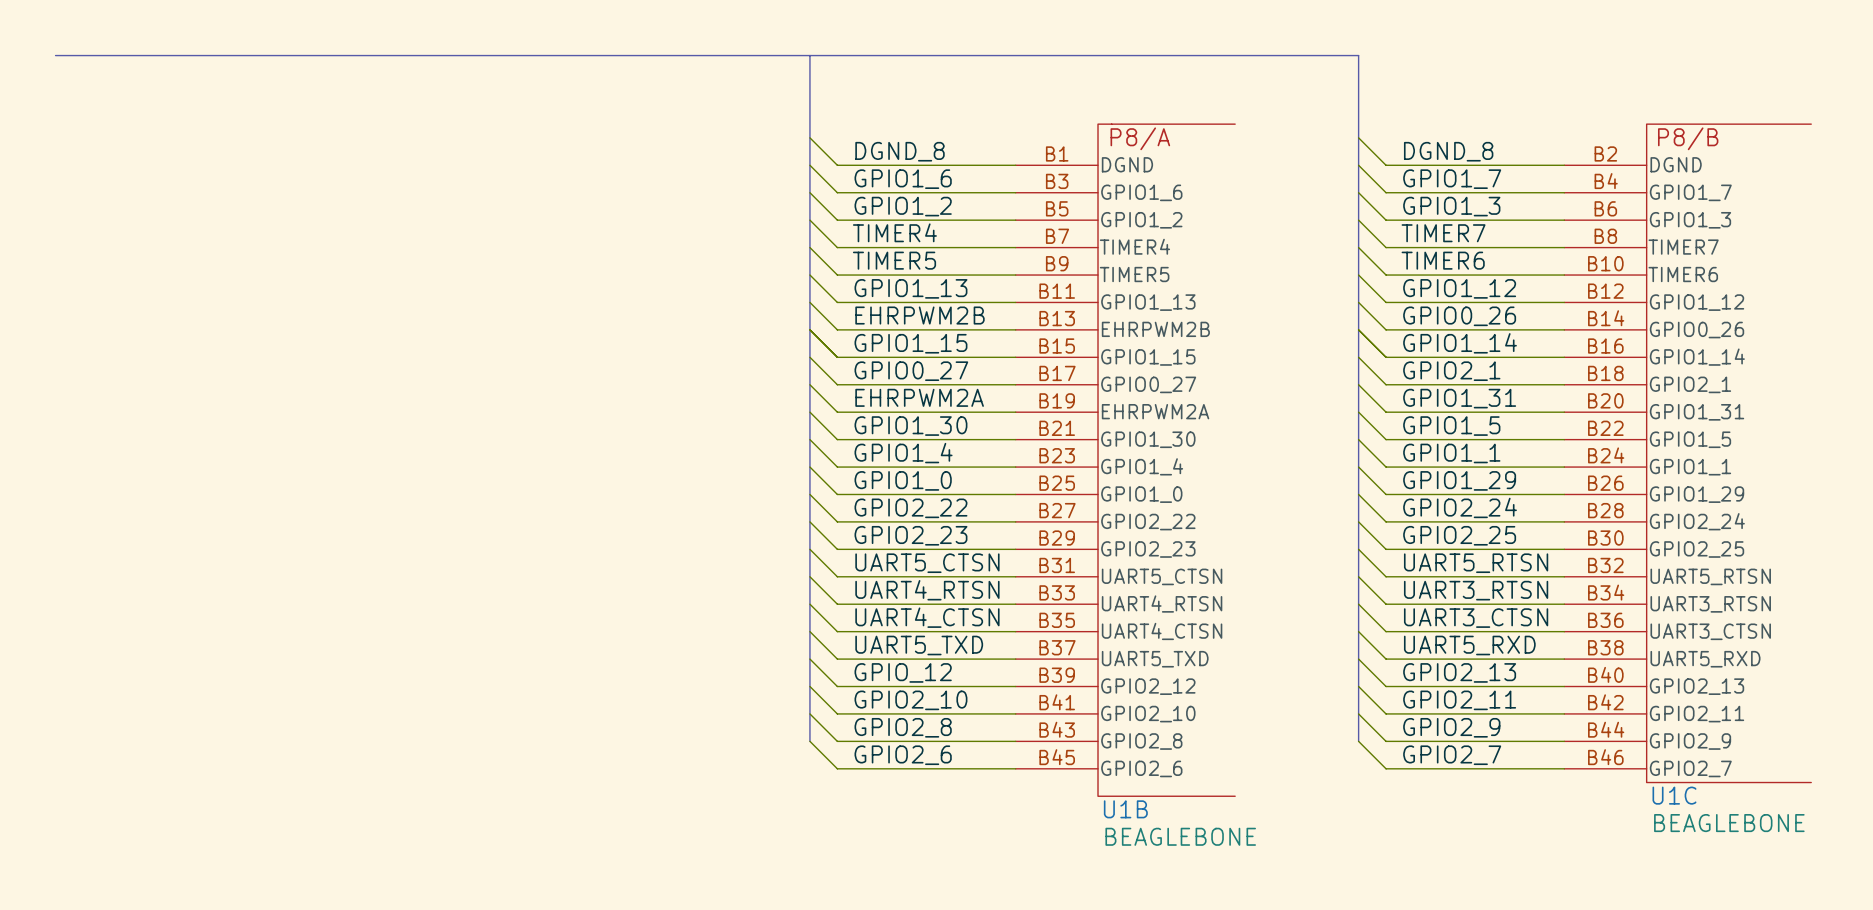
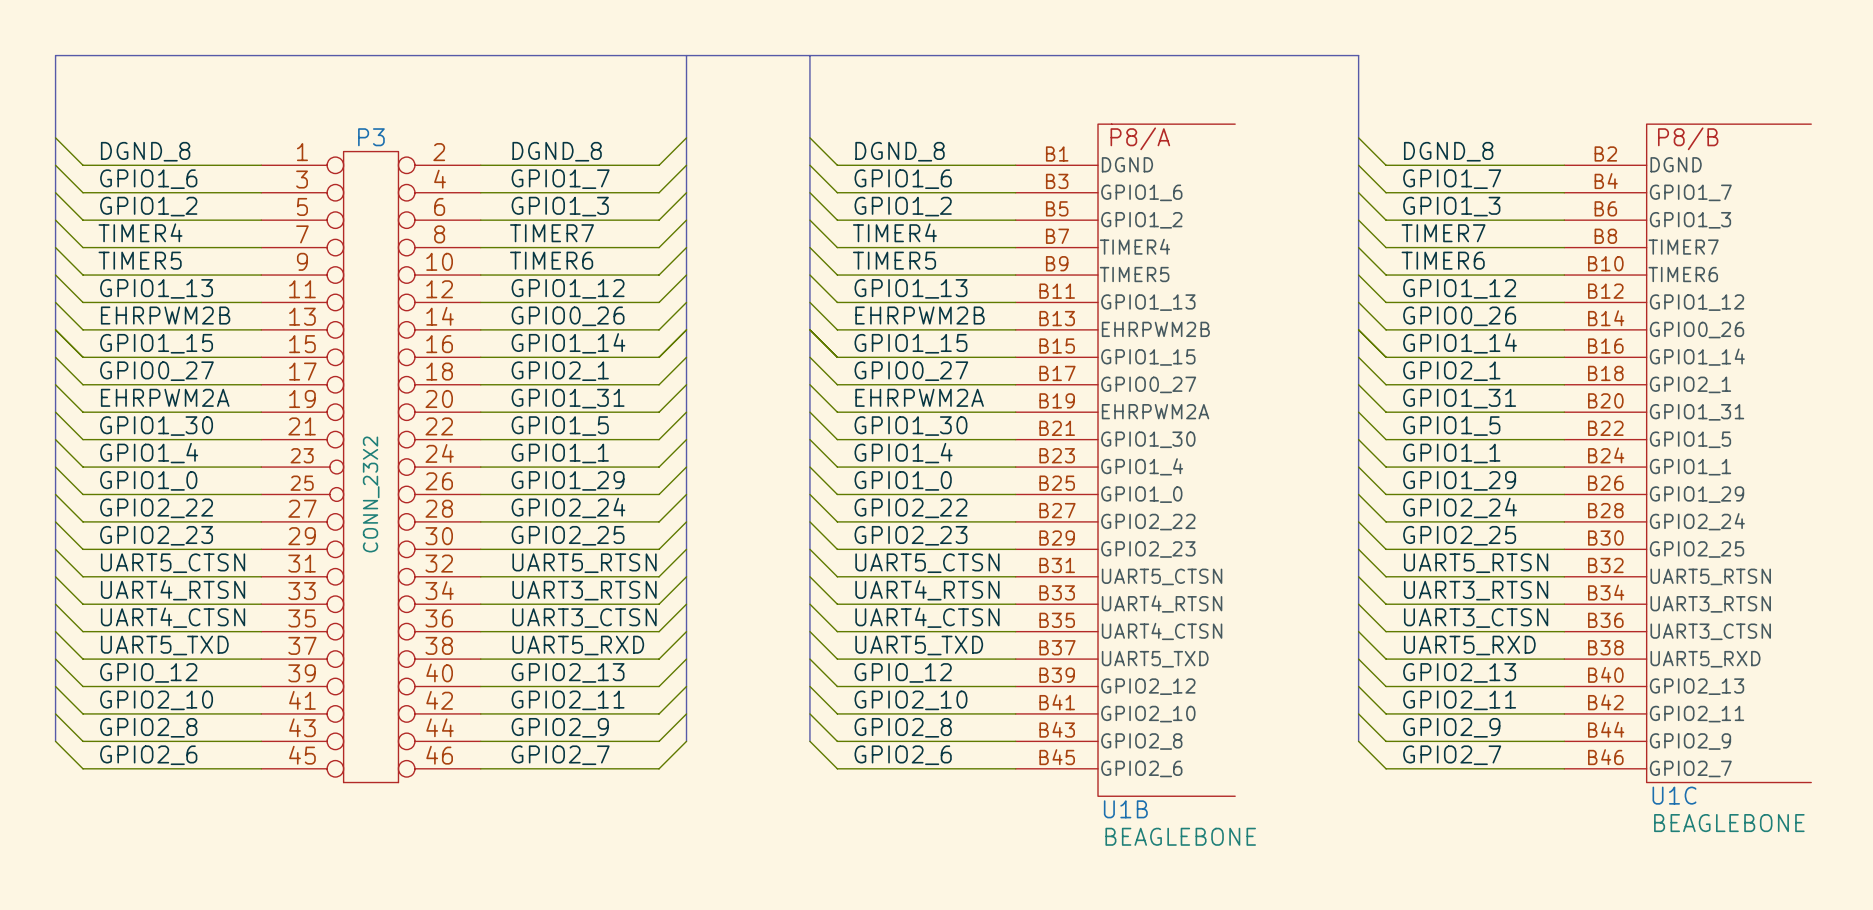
bus: none -> (55, 55) (55, 741)
bus: none -> (686, 55) (686, 741)
wire: none -> (55, 137) (82, 165) (261, 165)
wire: none -> (686, 137) (659, 165) (480, 165)
label: none -> DGND_8 (145, 151)
label: none -> DGND_8 (557, 151)
wire: none -> (55, 165) (82, 192) (261, 192)
wire: none -> (686, 165) (659, 192) (480, 192)
label: none -> GPIO1_6 (148, 179)
label: none -> GPIO1_7 (560, 179)
wire: none -> (55, 192) (82, 220) (261, 220)
wire: none -> (686, 192) (659, 220) (480, 220)
label: none -> GPIO1_2 (148, 206)
label: none -> GPIO1_3 (560, 206)
wire: none -> (55, 220) (82, 247) (261, 247)
wire: none -> (686, 220) (659, 247) (480, 247)
label: none -> TIMER4 (140, 232)
label: none -> TIMER7 (552, 233)
wire: none -> (55, 247) (82, 275) (261, 275)
wire: none -> (686, 247) (659, 275) (480, 275)
label: none -> TIMER5 (140, 260)
label: none -> TIMER6 (551, 260)
wire: none -> (55, 275) (82, 302) (261, 302)
wire: none -> (686, 275) (659, 302) (480, 302)
label: none -> GPIO1_13 (156, 288)
label: none -> GPIO1_12 (568, 288)
wire: none -> (55, 302) (82, 329) (261, 329)
wire: none -> (686, 302) (659, 329) (480, 329)
label: none -> EHRPWM2B (165, 315)
label: none -> GPIO0_26 (568, 316)
wire: none -> (55, 329) (82, 357) (261, 357)
wire: none -> (686, 329) (659, 357) (480, 357)
label: none -> GPIO1_15 (156, 343)
label: none -> GPIO1_14 (568, 343)
wire: none -> (55, 357) (82, 384) (261, 384)
wire: none -> (686, 357) (659, 384) (480, 384)
label: none -> GPIO0_27 (156, 371)
label: none -> GPIO2_1 (560, 371)
wire: none -> (55, 384) (82, 412) (261, 412)
wire: none -> (686, 384) (659, 412) (480, 412)
label: none -> EHRPWM2A (165, 397)
label: none -> GPIO1_31 (568, 398)
wire: none -> (55, 412) (82, 439) (261, 439)
wire: none -> (686, 412) (659, 439) (480, 439)
label: none -> GPIO1_30 (156, 426)
label: none -> GPIO1_5 (560, 426)
wire: none -> (55, 439) (82, 467) (261, 467)
wire: none -> (686, 439) (659, 467) (480, 467)
label: none -> GPIO1_4 (149, 453)
label: none -> GPIO1_1 (560, 453)
wire: none -> (55, 467) (82, 494) (261, 494)
P3: none -> CONN_23X2 (371, 467)
wire: none -> (686, 467) (659, 494) (480, 494)
label: none -> GPIO1_0 (148, 480)
label: none -> GPIO1_29 (568, 480)
wire: none -> (55, 494) (82, 521) (261, 521)
wire: none -> (686, 494) (659, 521) (480, 521)
label: none -> GPIO2_24 (568, 507)
label: none -> GPIO2_22 (156, 508)
wire: none -> (55, 521) (82, 549) (261, 549)
wire: none -> (686, 521) (659, 549) (480, 549)
label: none -> GPIO2_23 (156, 535)
label: none -> GPIO2_25 (568, 535)
wire: none -> (55, 549) (82, 576) (261, 576)
wire: none -> (686, 549) (659, 576) (480, 576)
label: none -> UART5_CTSN (173, 563)
label: none -> UART5_RTSN (584, 563)
wire: none -> (55, 576) (82, 604) (261, 604)
wire: none -> (686, 576) (659, 604) (480, 604)
label: none -> UART4_RTSN (173, 590)
label: none -> UART3_RTSN (584, 590)
wire: none -> (55, 604) (82, 631) (261, 631)
wire: none -> (686, 604) (659, 631) (480, 631)
label: none -> UART4_CTSN (173, 617)
label: none -> UART3_CTSN (584, 618)
wire: none -> (55, 631) (82, 659) (261, 659)
wire: none -> (686, 631) (659, 659) (480, 659)
label: none -> UART5_TXD (164, 645)
label: none -> UART5_RXD (578, 645)
wire: none -> (55, 659) (82, 686) (261, 686)
wire: none -> (686, 659) (659, 686) (480, 686)
label: none -> GPIO_12 (148, 672)
label: none -> GPIO2_13 (568, 672)
wire: none -> (55, 686) (82, 713) (261, 713)
wire: none -> (686, 686) (659, 713) (480, 713)
label: none -> GPIO2_10 (156, 700)
label: none -> GPIO2_11 (568, 700)
wire: none -> (55, 713) (82, 741) (261, 741)
wire: none -> (686, 713) (659, 741) (480, 741)
label: none -> GPIO2_8 (148, 727)
label: none -> GPIO2_9 (560, 727)
wire: none -> (55, 741) (82, 768) (261, 768)
wire: none -> (686, 741) (659, 768) (480, 768)
label: none -> GPIO2_6 (148, 755)
label: none -> GPIO2_7 (560, 755)

